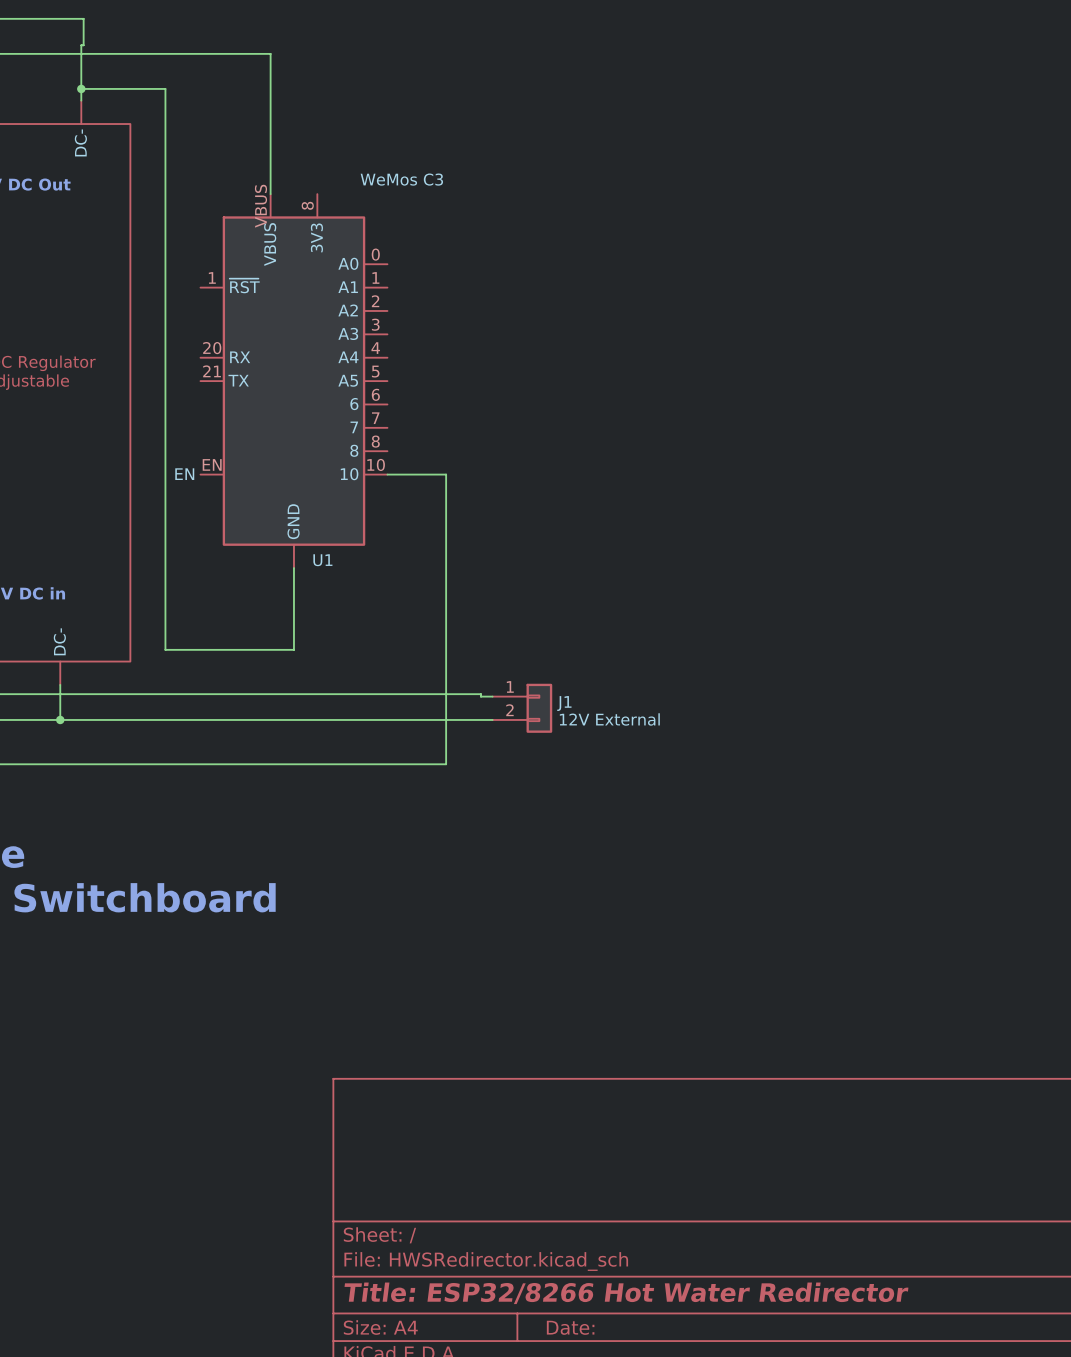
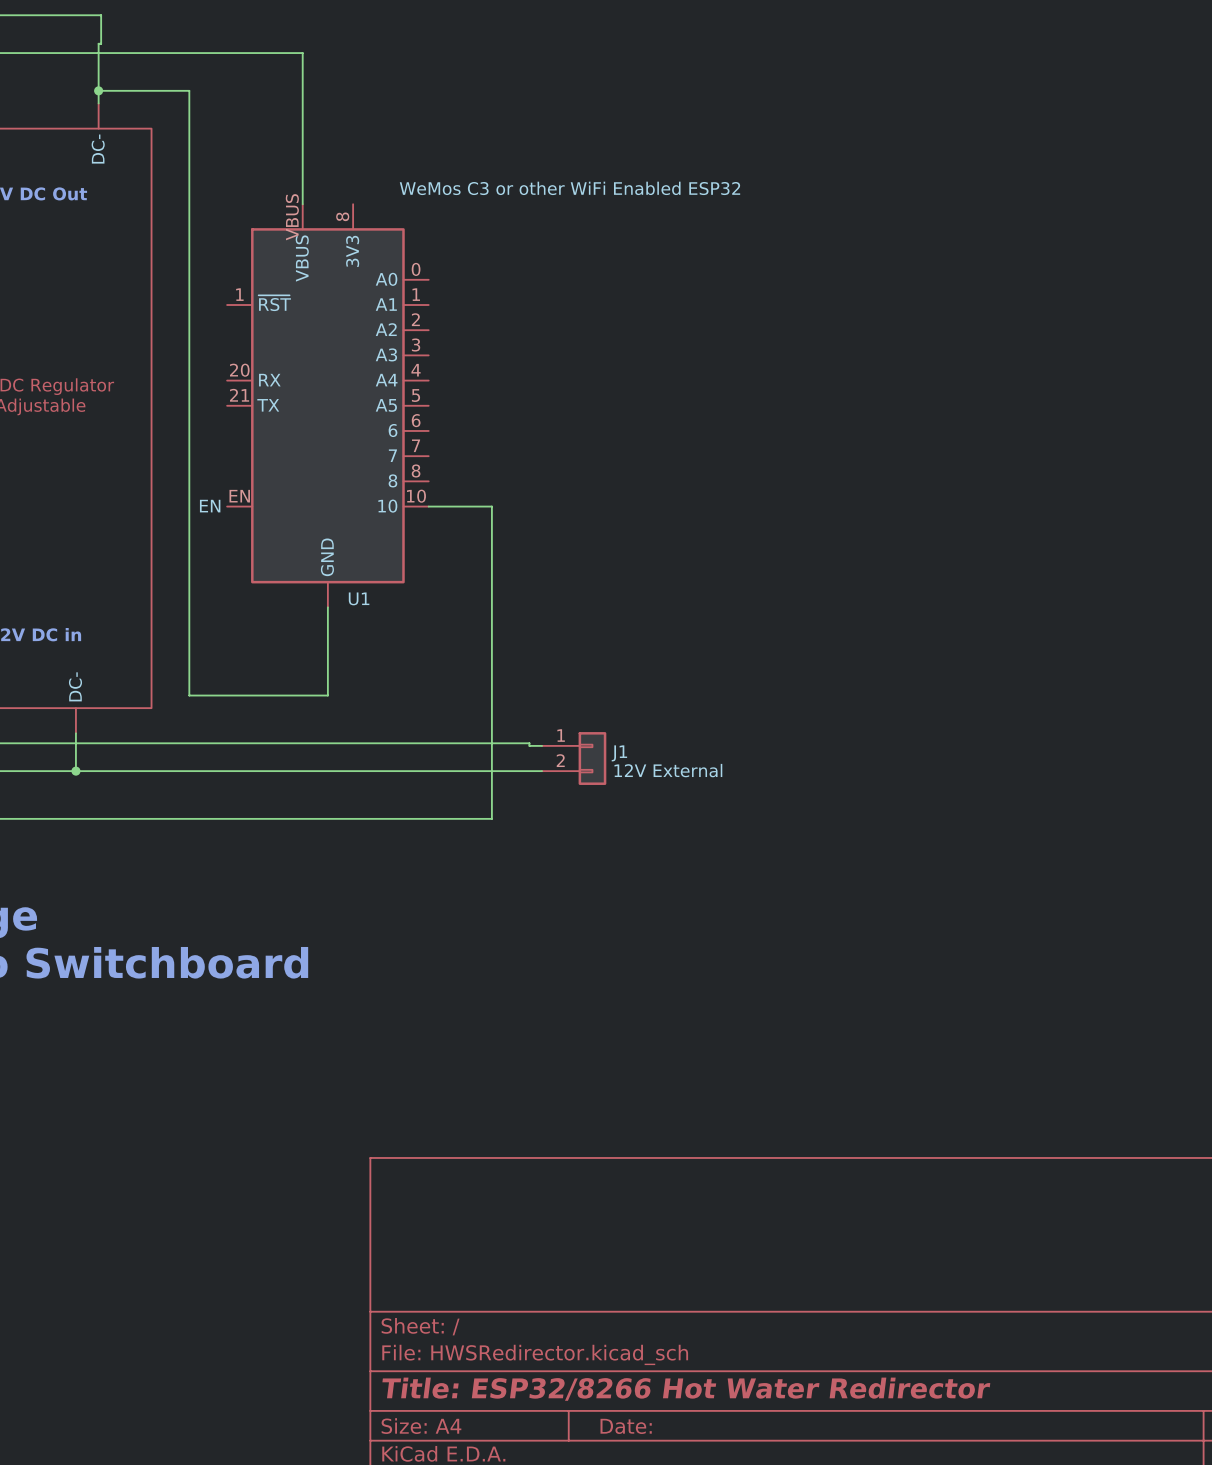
U1 value: WeMos C3 (401, 179) -> WeMos C3 or other WiFi Enabled ESP32 (569, 188)

